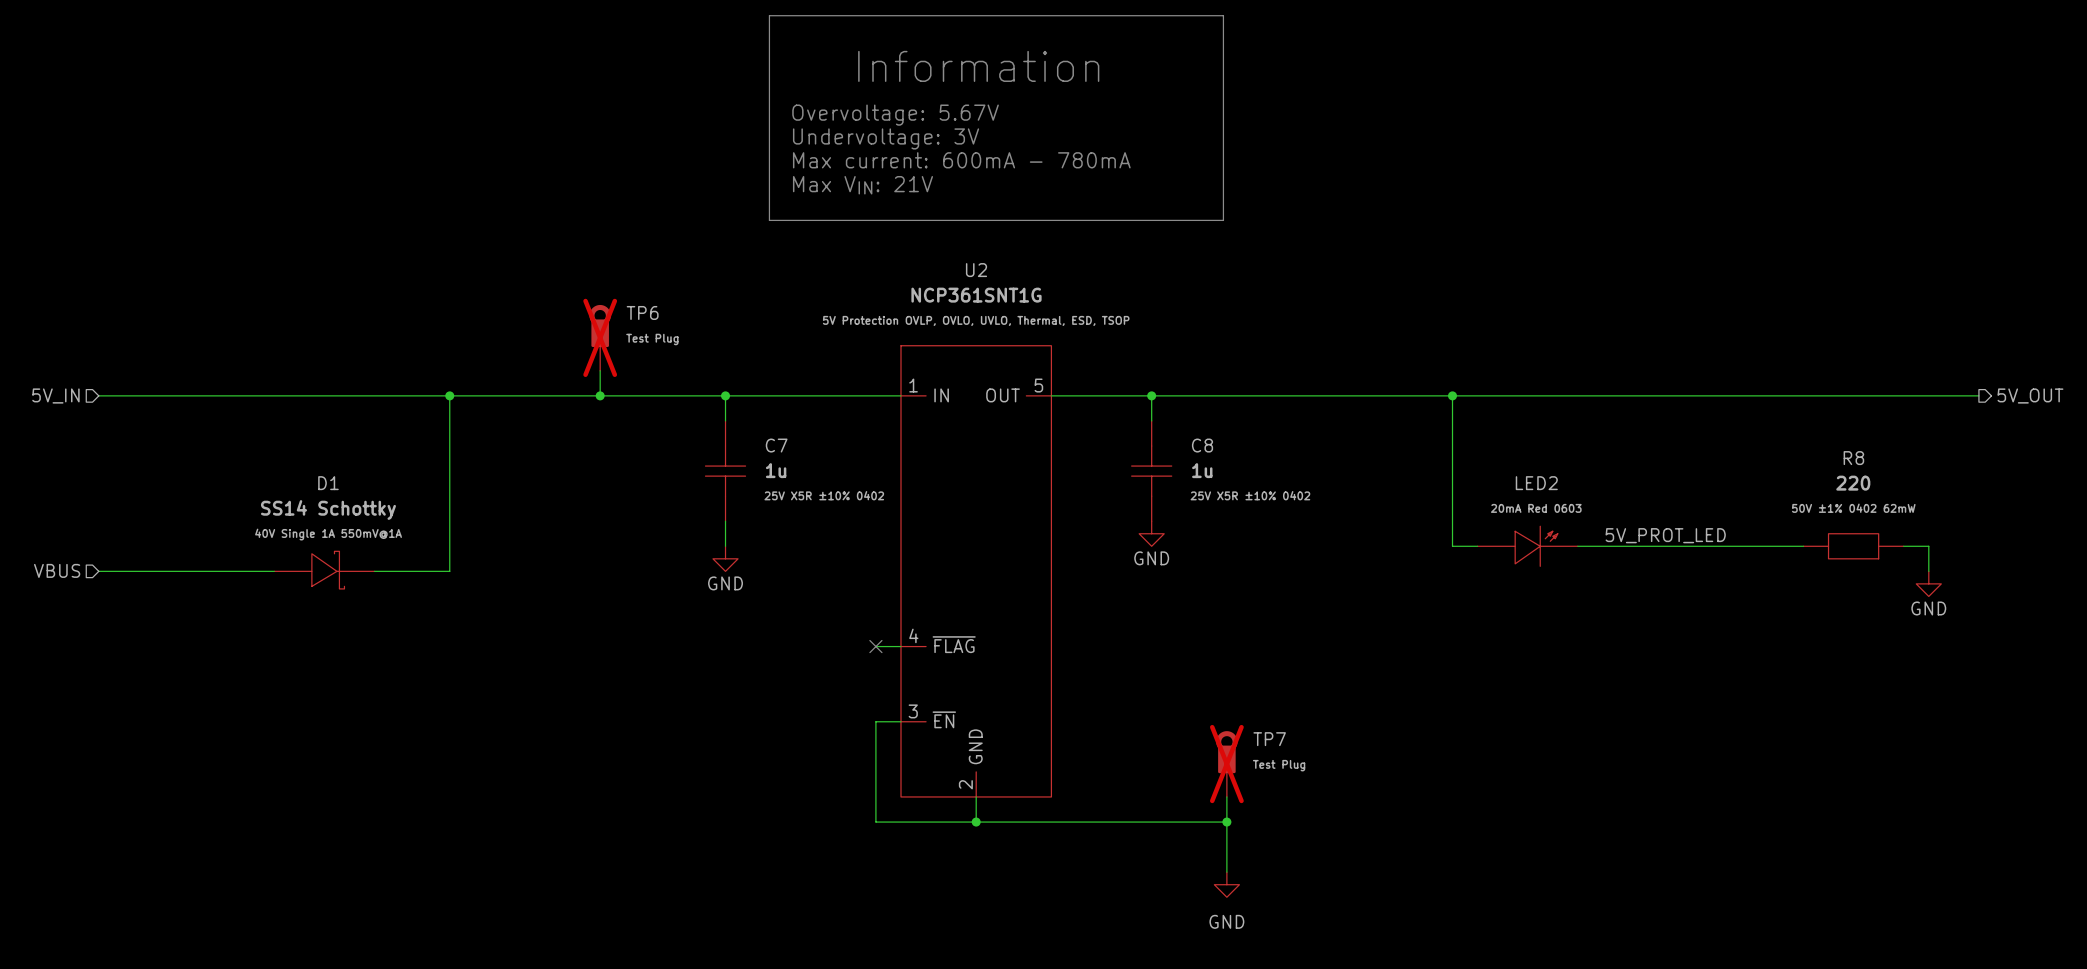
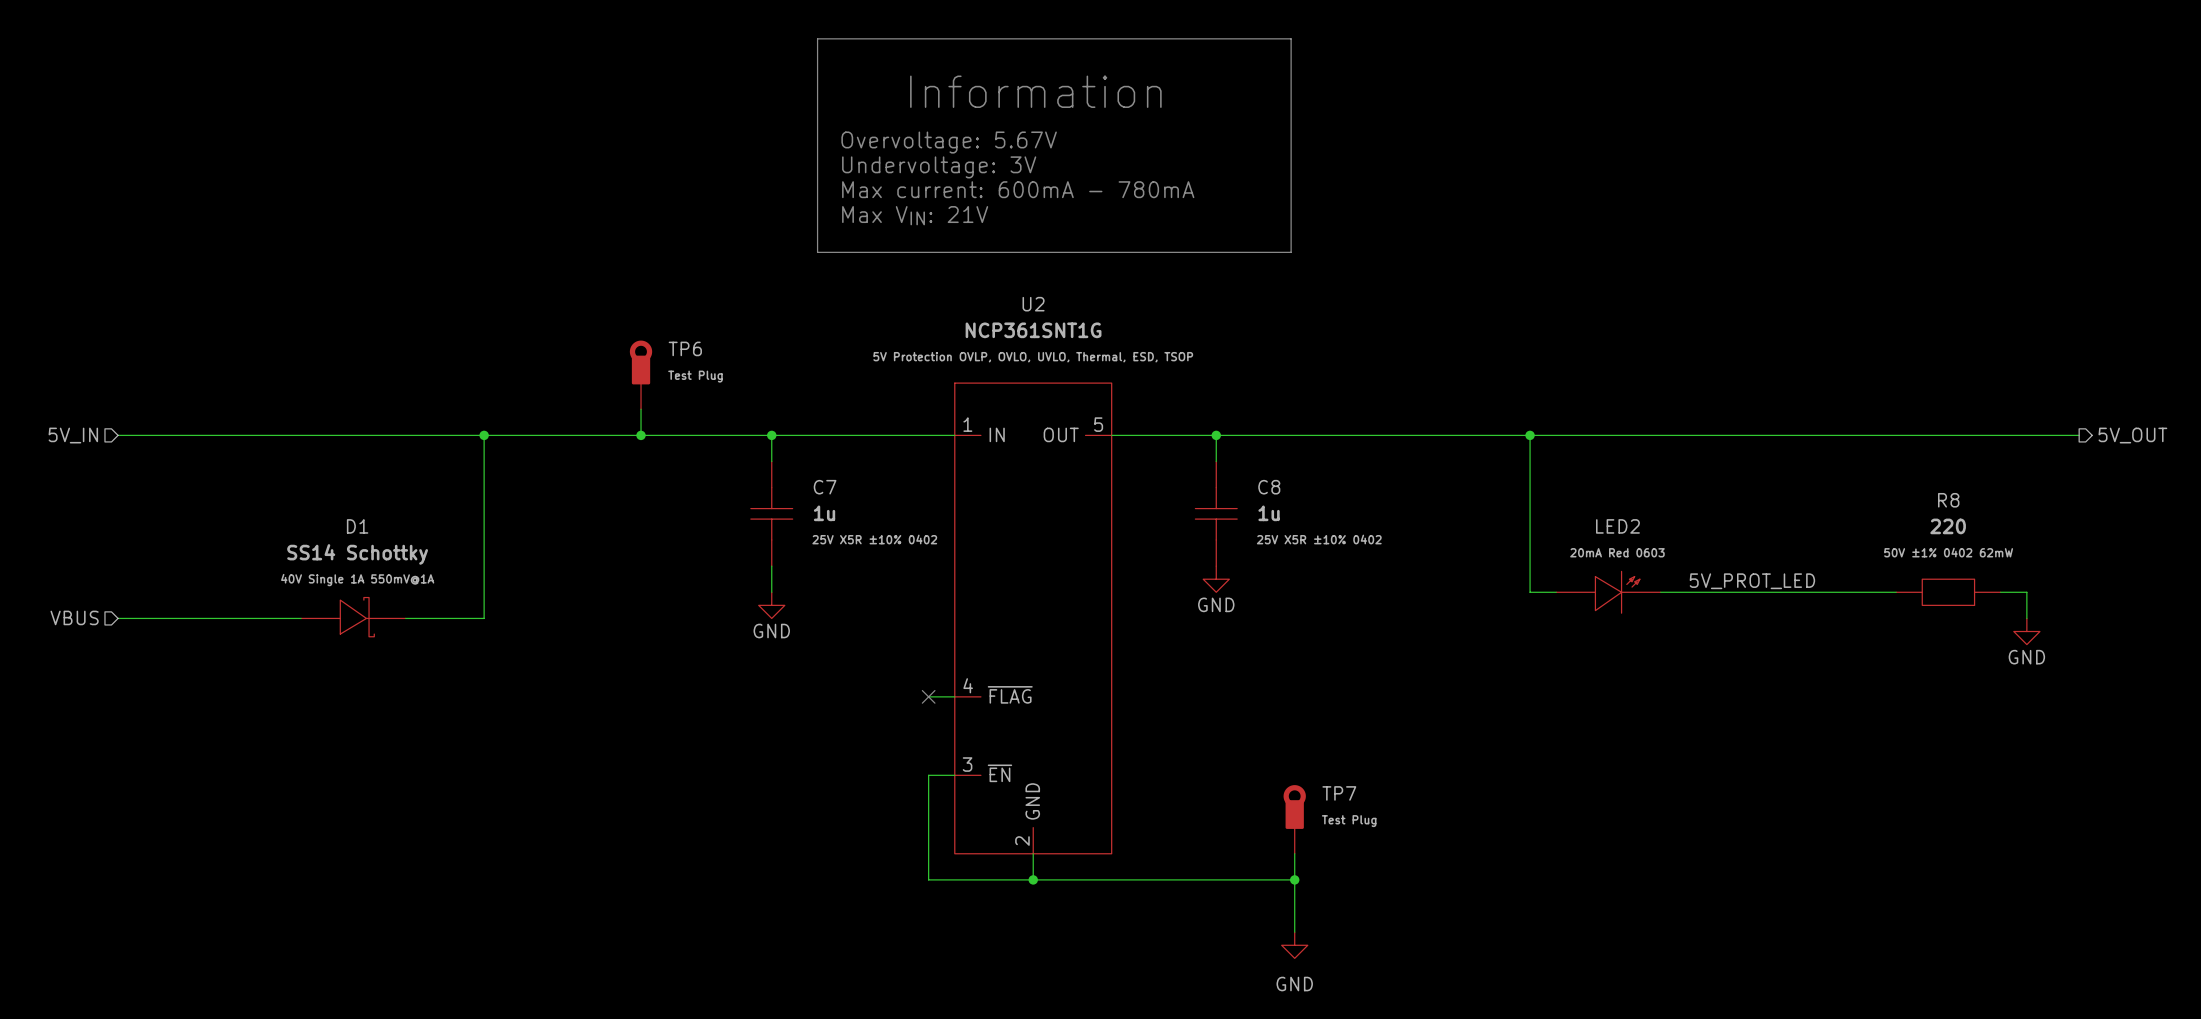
TP6 do-not-place cross: (600, 337) -> none
TP7 do-not-place cross: (1226, 764) -> none

